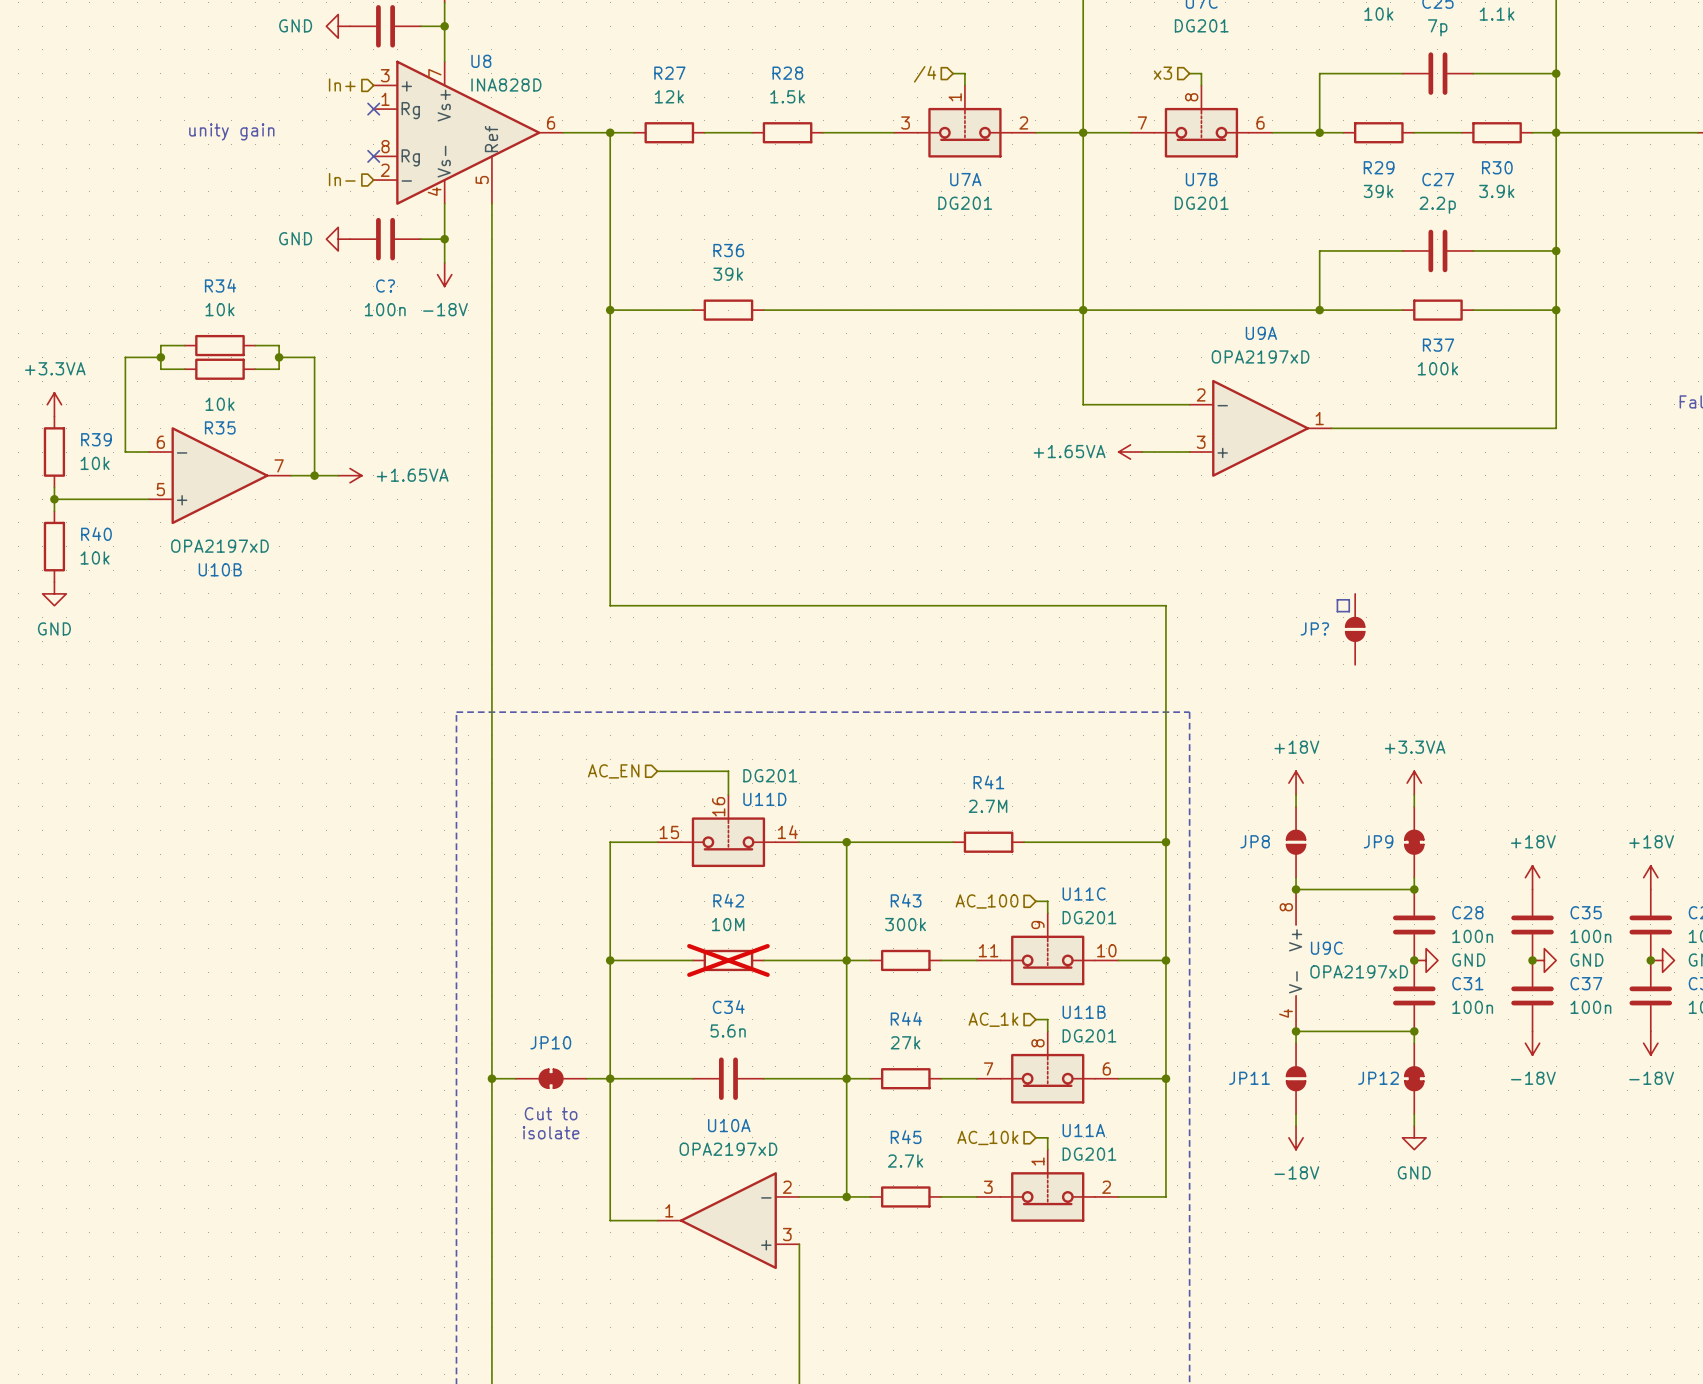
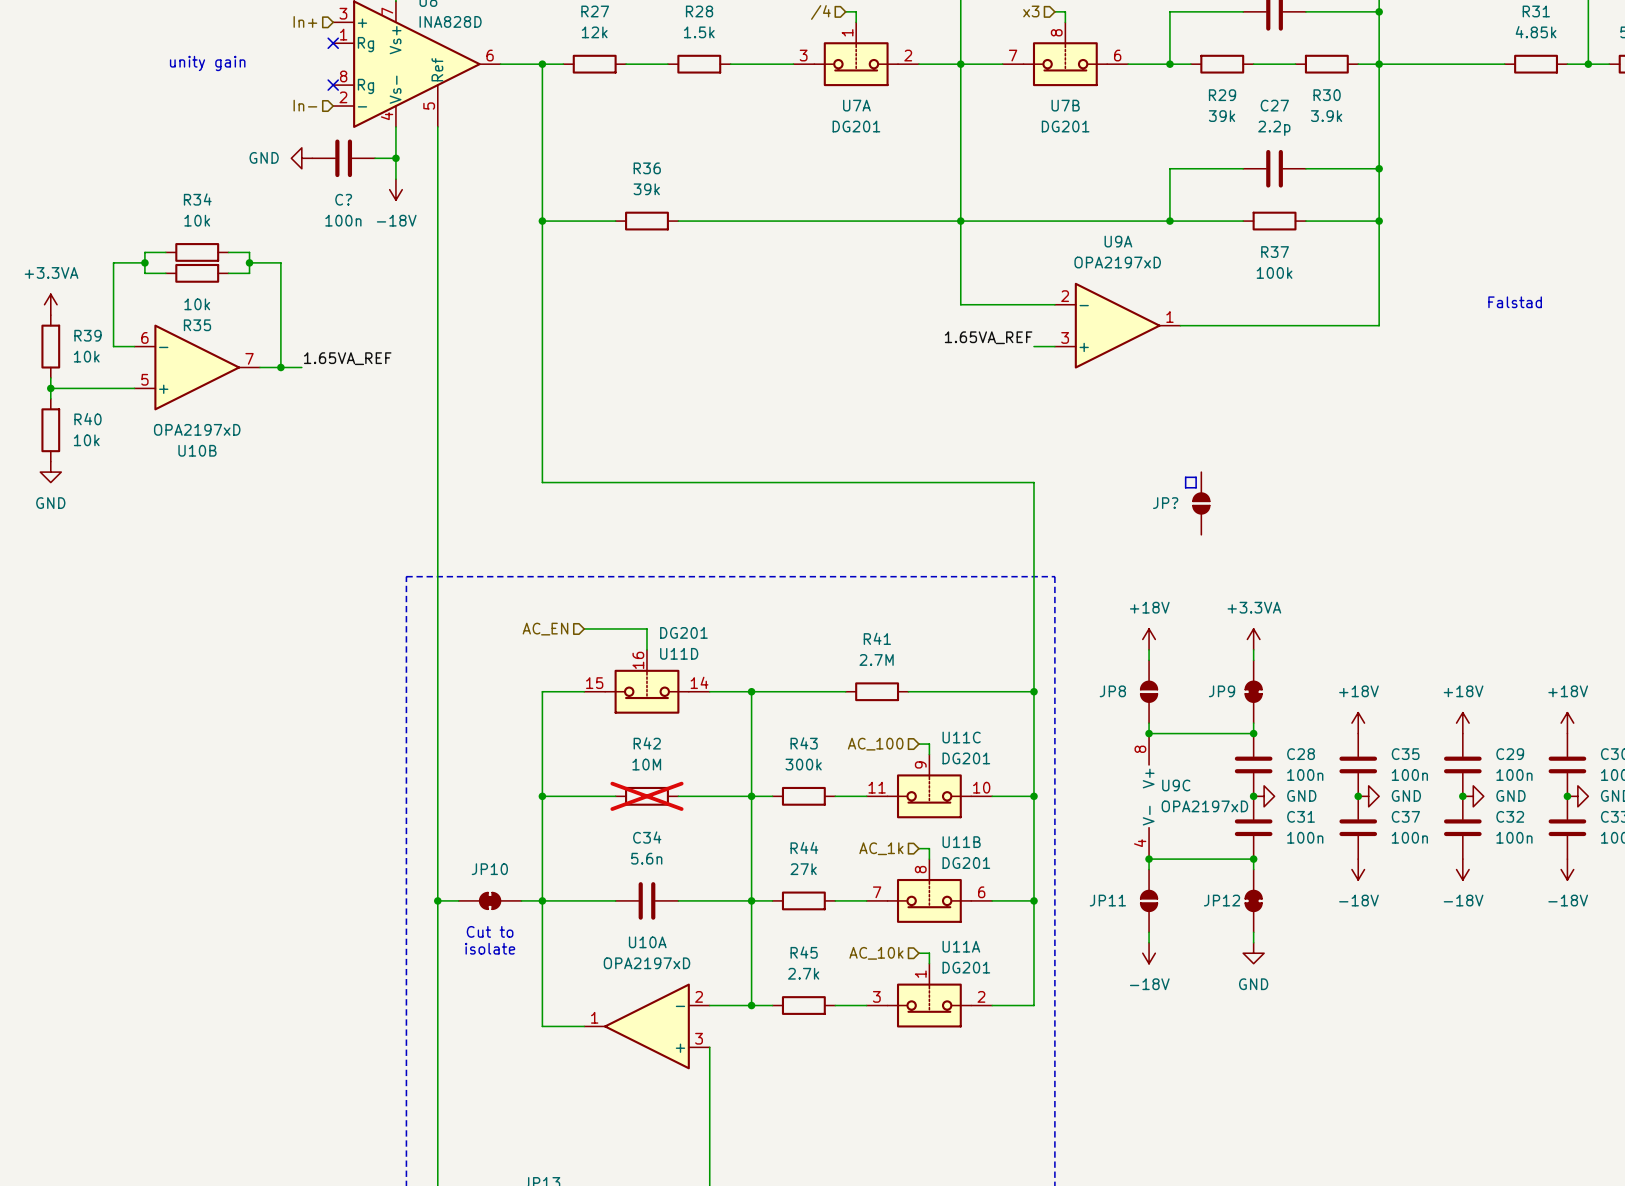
label: none -> 1.65VA_REF (988, 337)
power symbol: +1.65VA (1130, 452) -> none
wire: (1142, 452) (1165, 452) -> none
label: none -> 1.65VA_REF (347, 358)
power symbol: +1.65VA (350, 475) -> none

